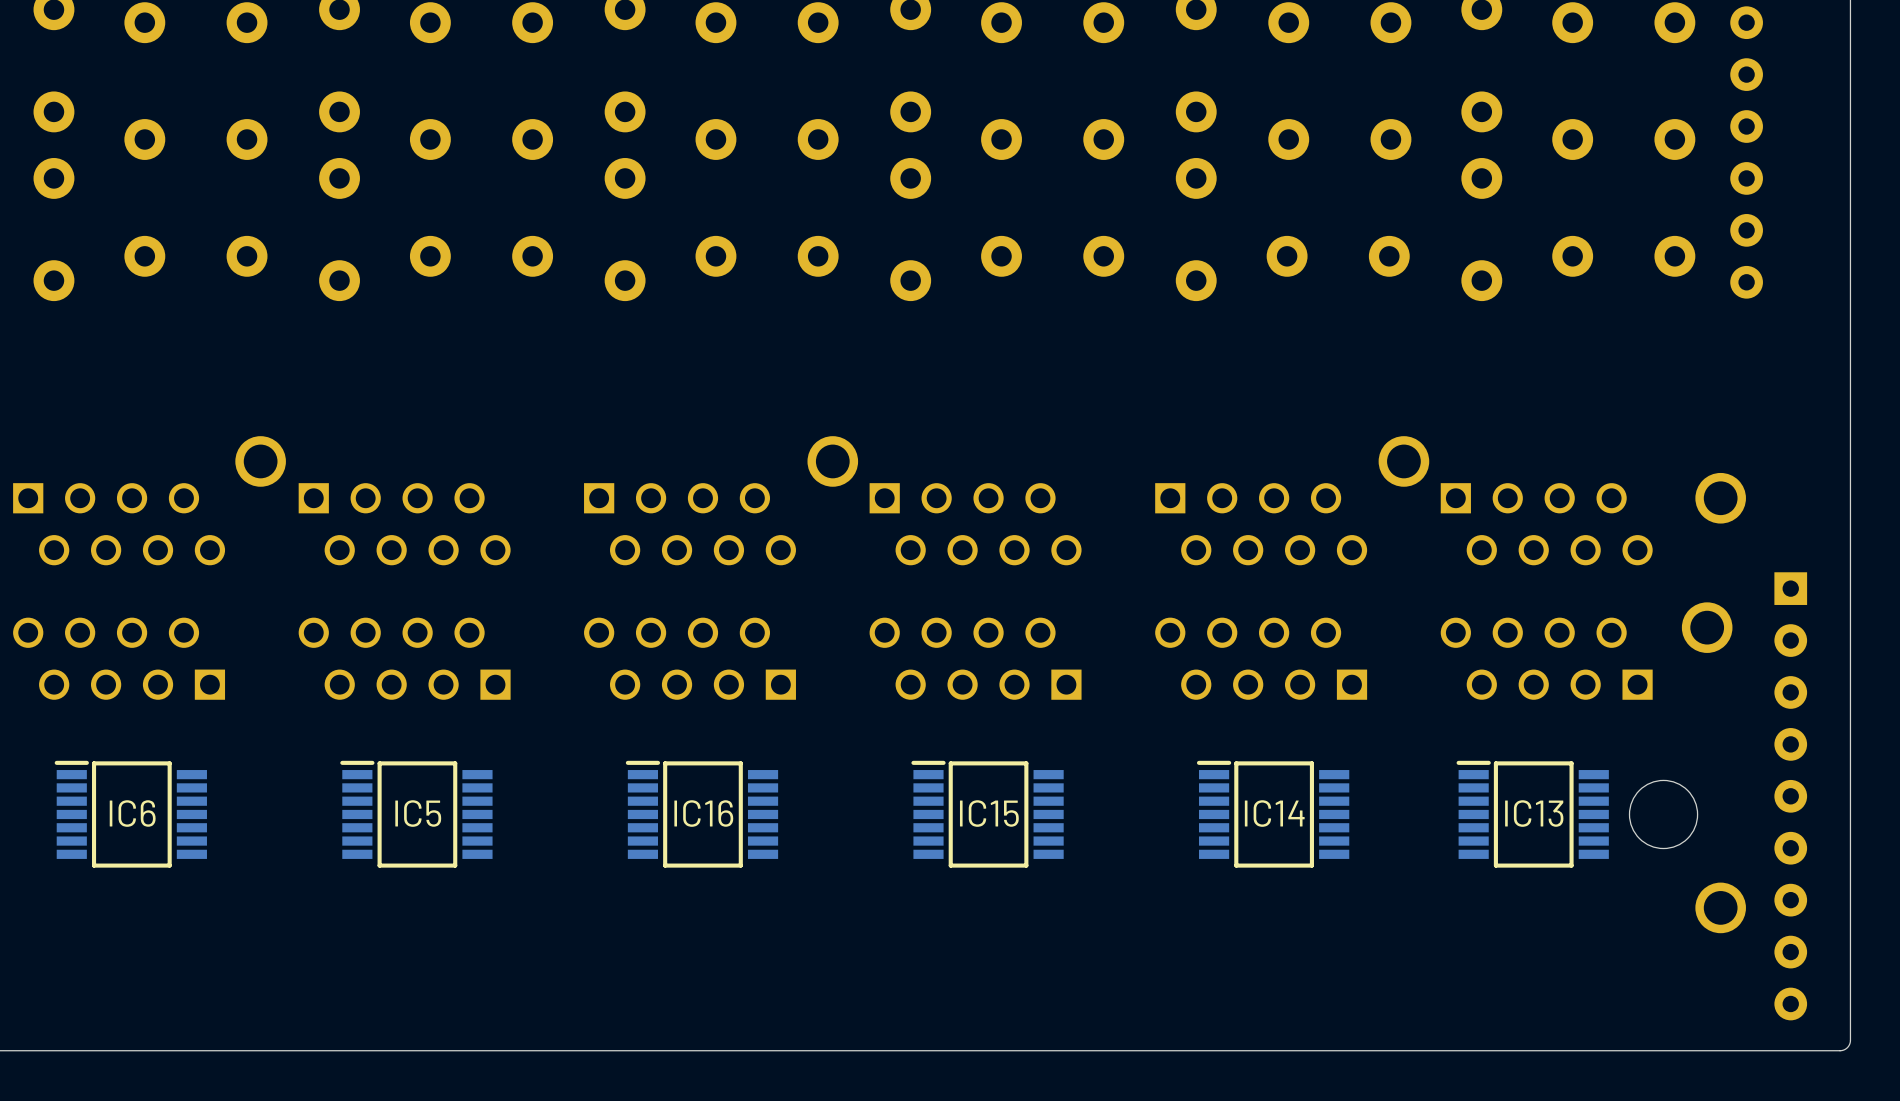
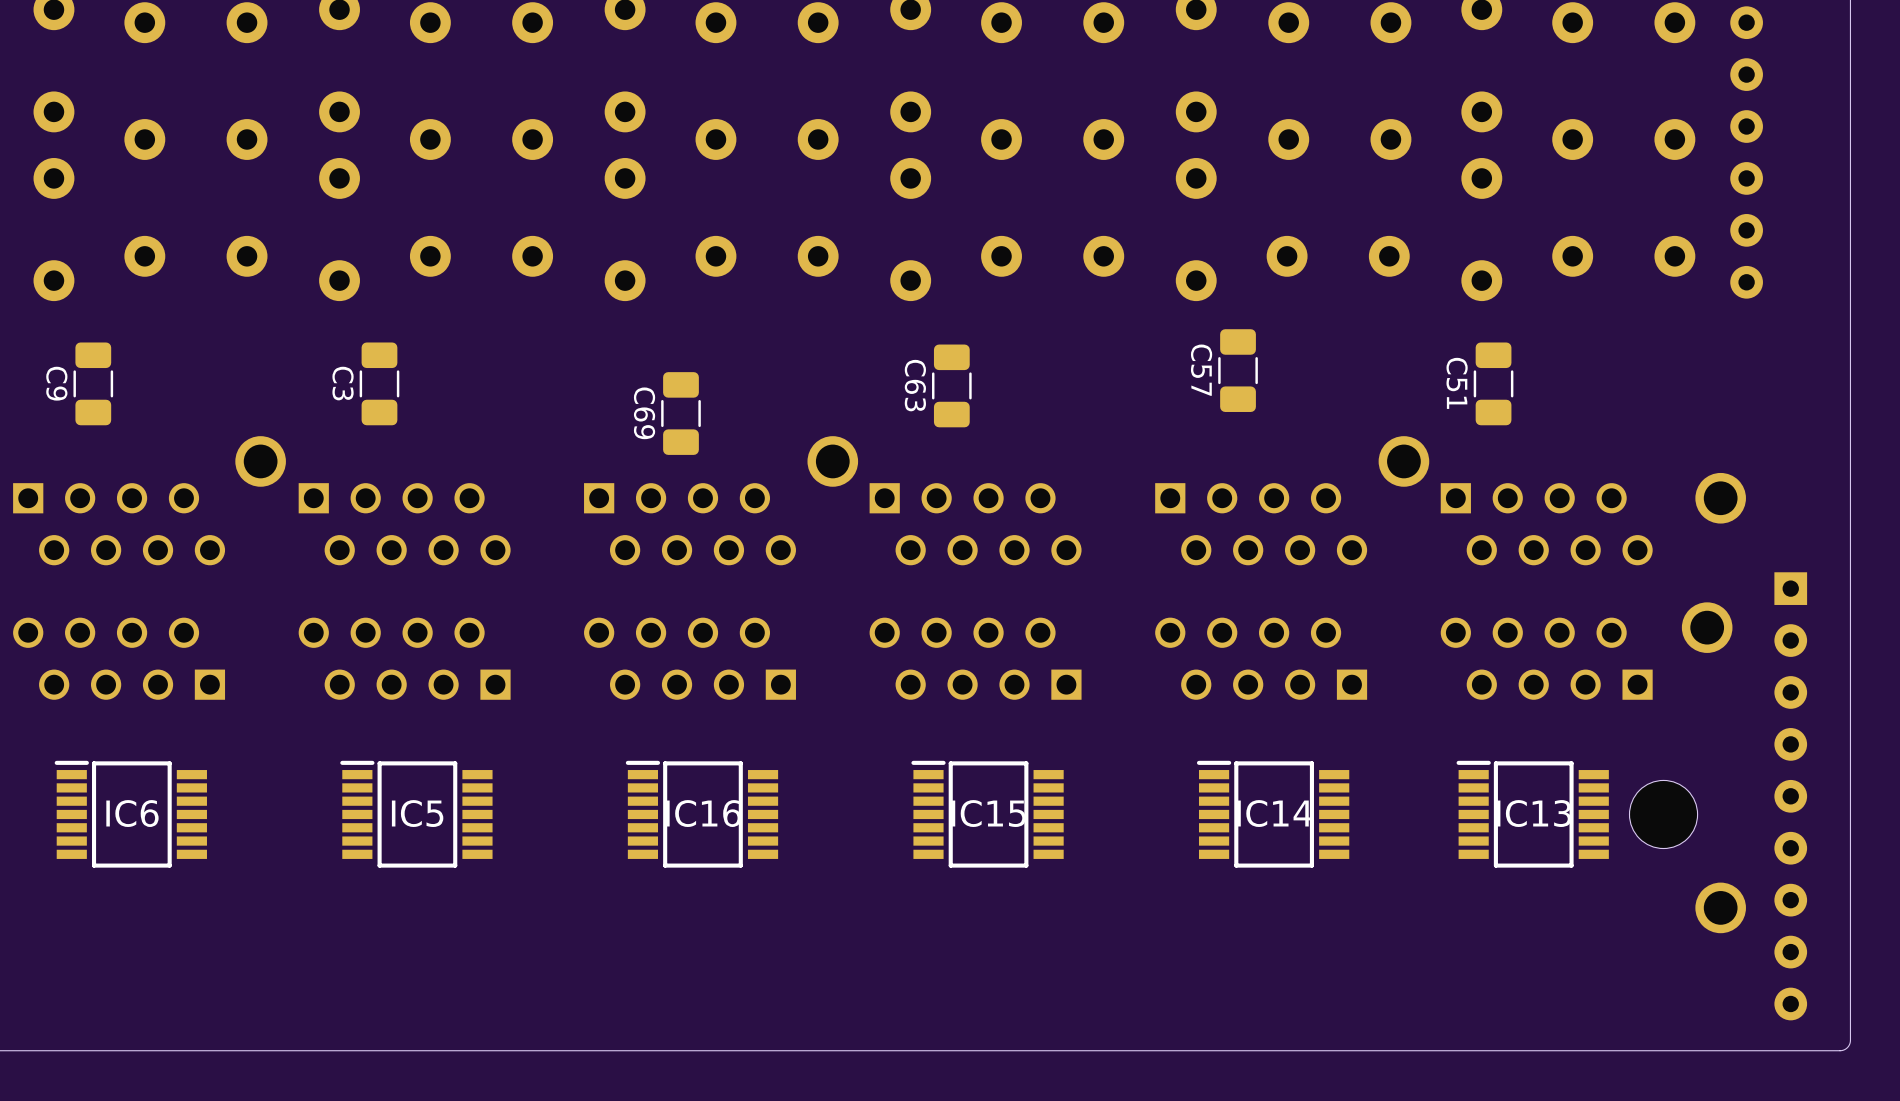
C57: none -> (1238, 370)
C9: none -> (93, 383)
C3: none -> (379, 383)
C51: none -> (1493, 383)
C63: none -> (951, 385)
C69: none -> (680, 413)

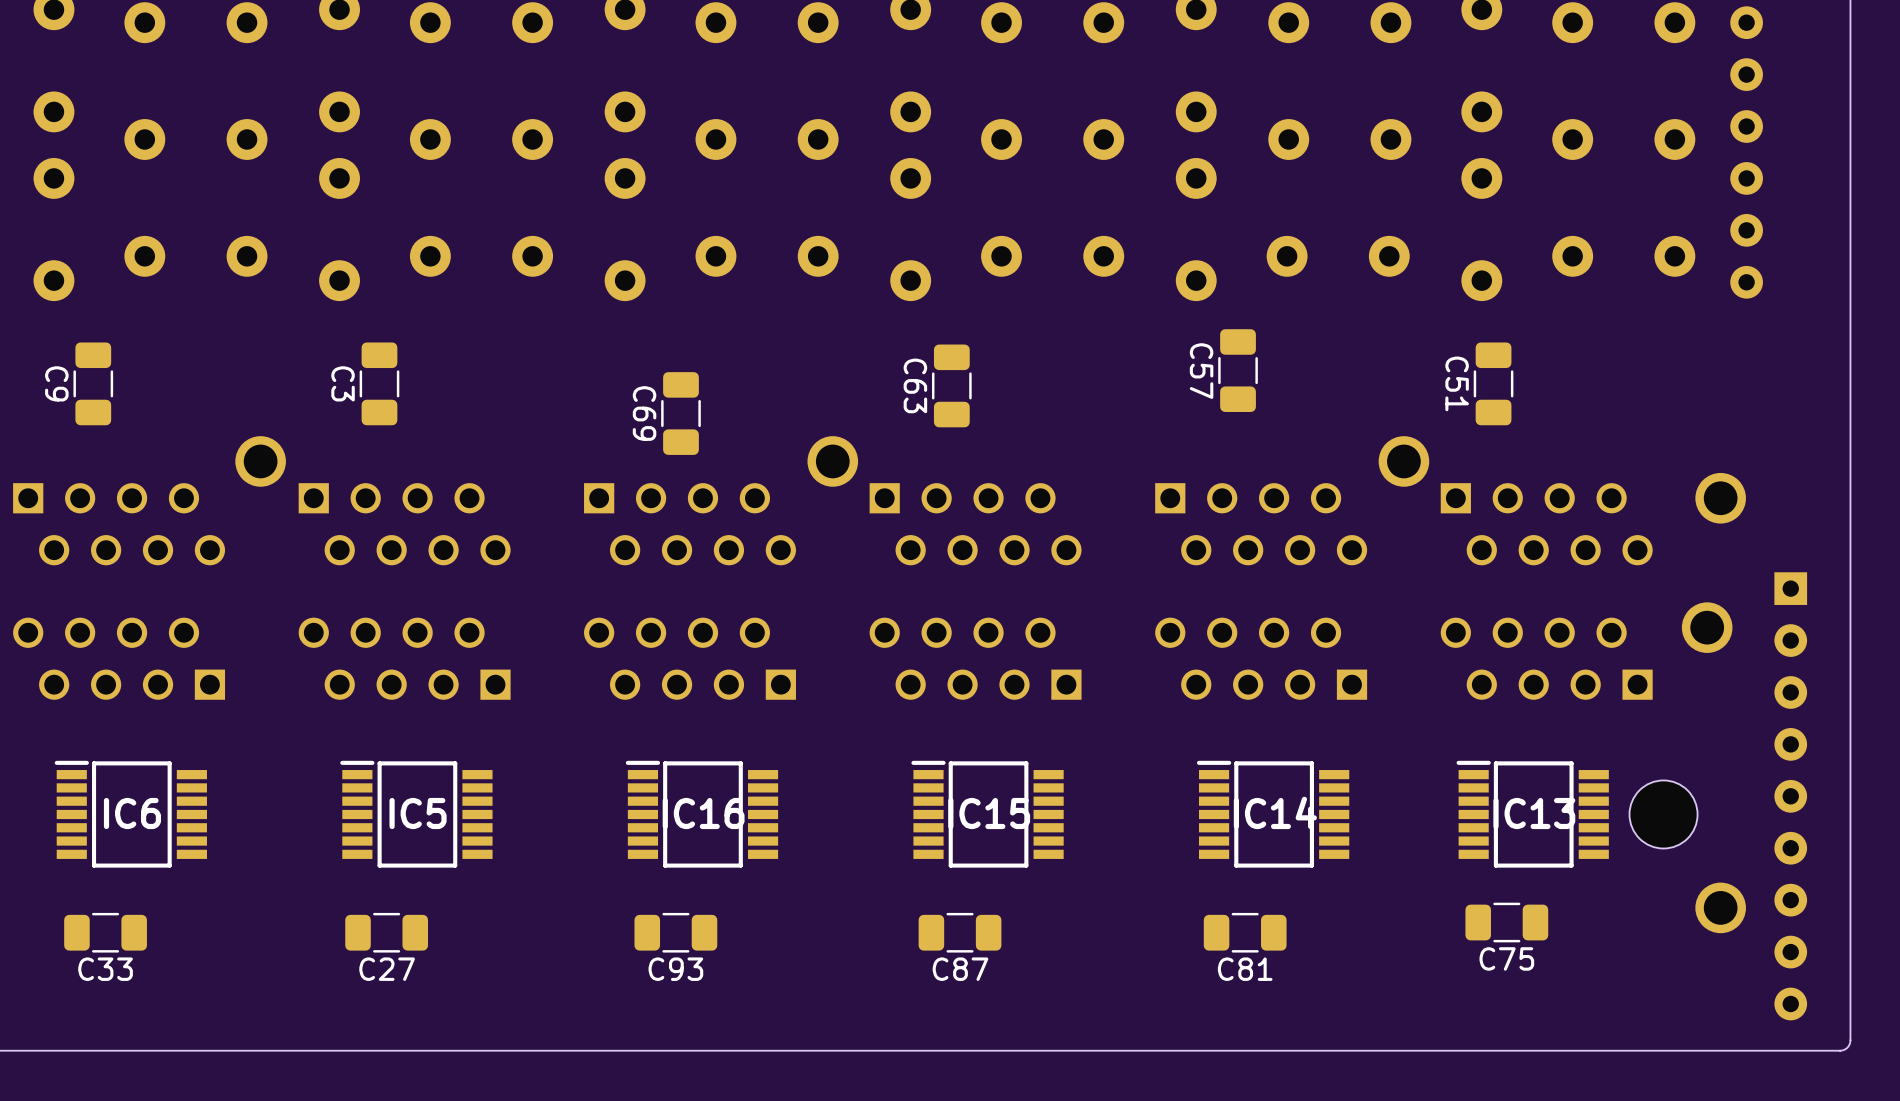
C75: none -> (1506, 922)
C33: none -> (105, 932)
C27: none -> (386, 932)
C93: none -> (675, 932)
C87: none -> (960, 932)
C81: none -> (1245, 932)

